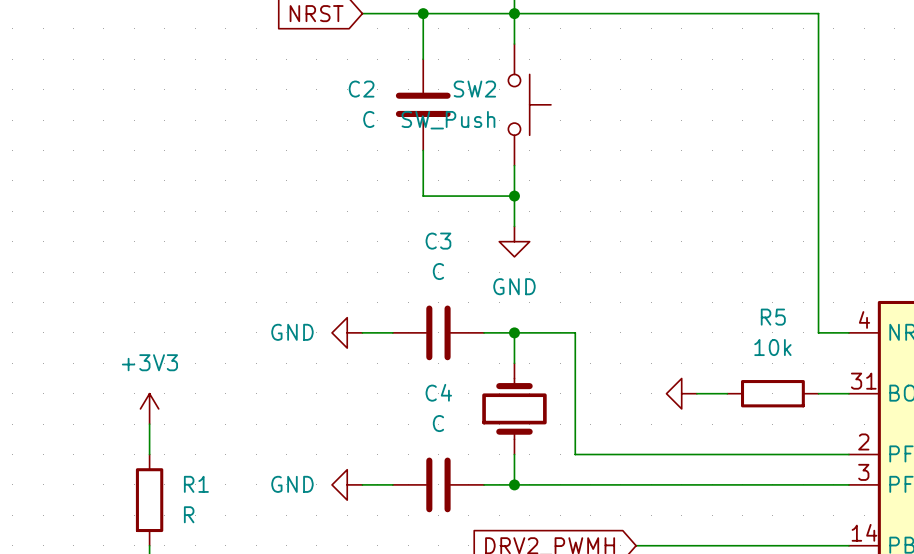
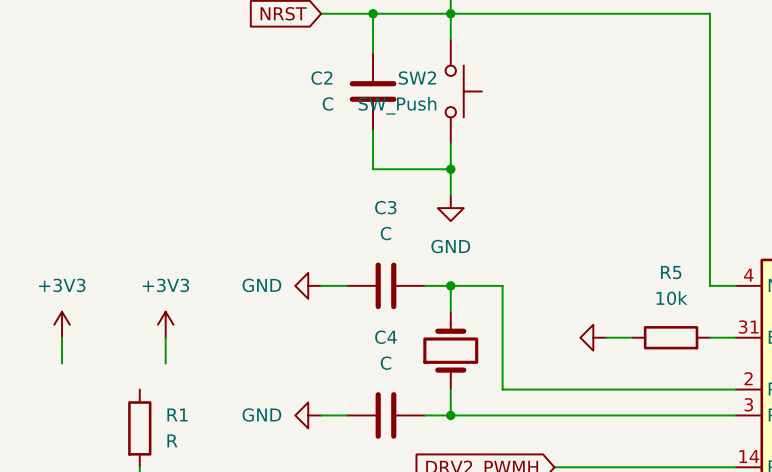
power symbol: none -> +3V3 (62, 324)
wire: none -> (62, 337) (62, 363)
power symbol position: +3V3 (149, 408) -> +3V3 (165, 324)
wire: (149, 424) (149, 454) -> (165, 337) (165, 363)

